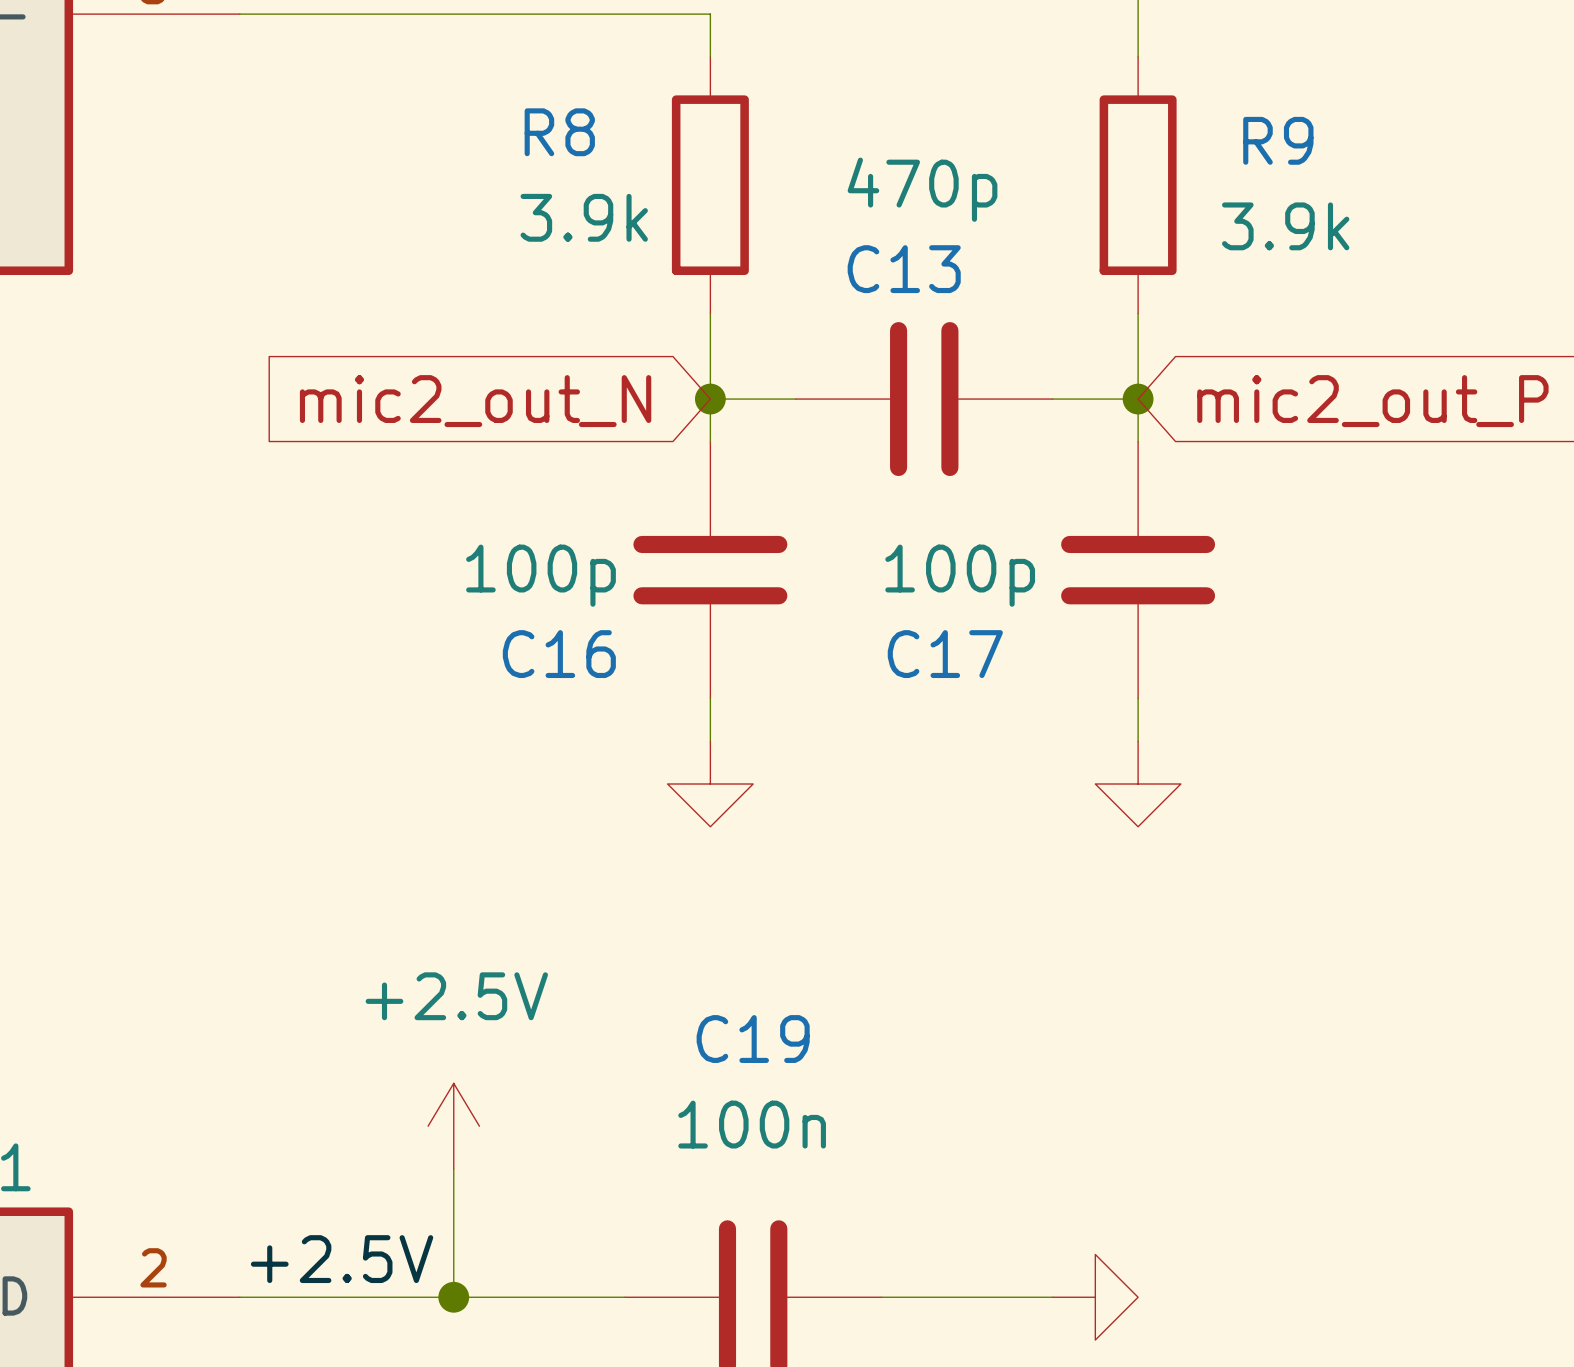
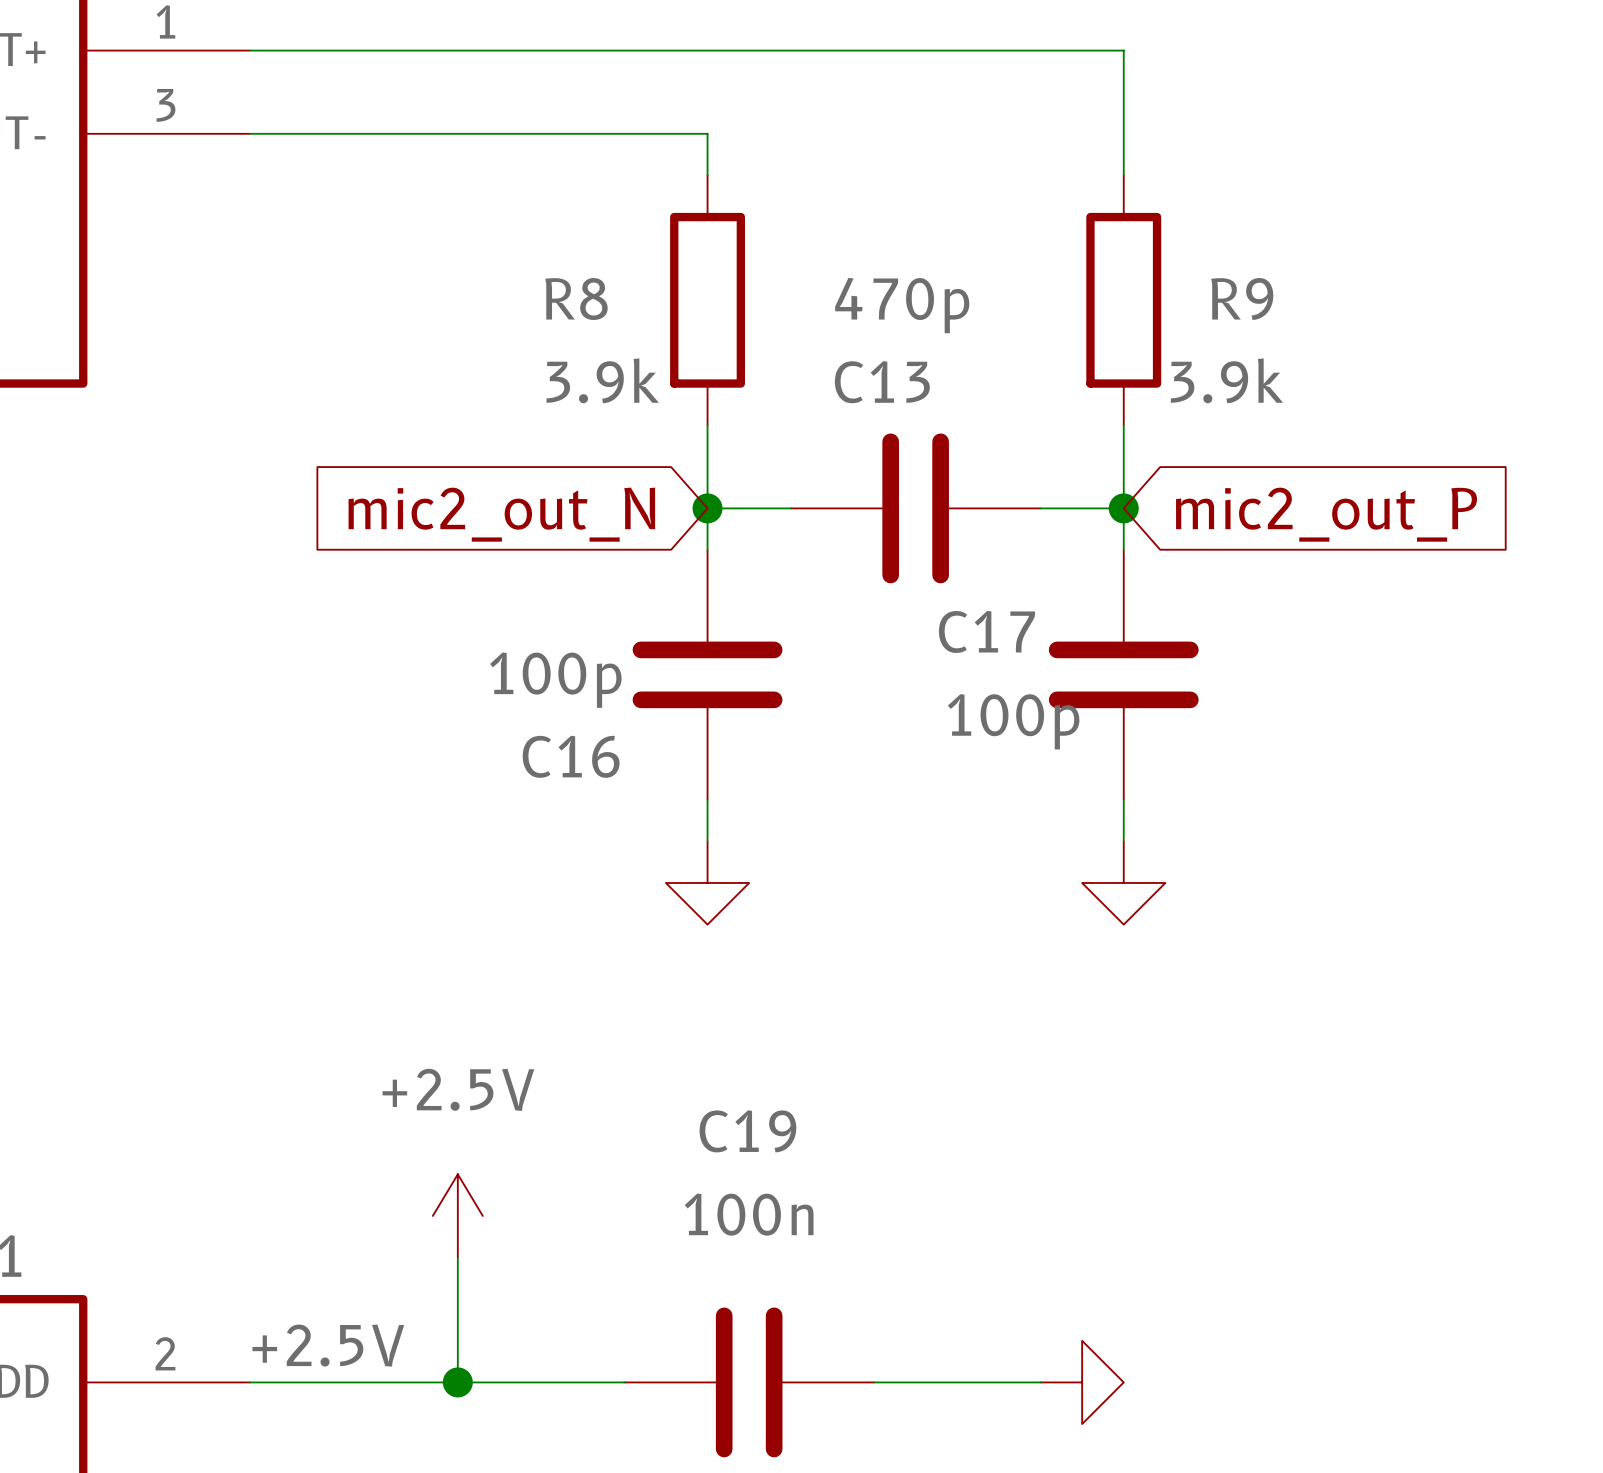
R8 name position: R8 (559, 132) -> R8 (576, 299)
R9 name position: R9 (1278, 140) -> R9 (1242, 299)
R8 value position: 3.9k (584, 217) -> 3.9k (602, 380)
R9 value position: 3.9k (1285, 226) -> 3.9k (1226, 380)
C17 value position: 100p (960, 575) -> 100p (1013, 721)
C17 name position: C17 (945, 654) -> C17 (986, 631)

